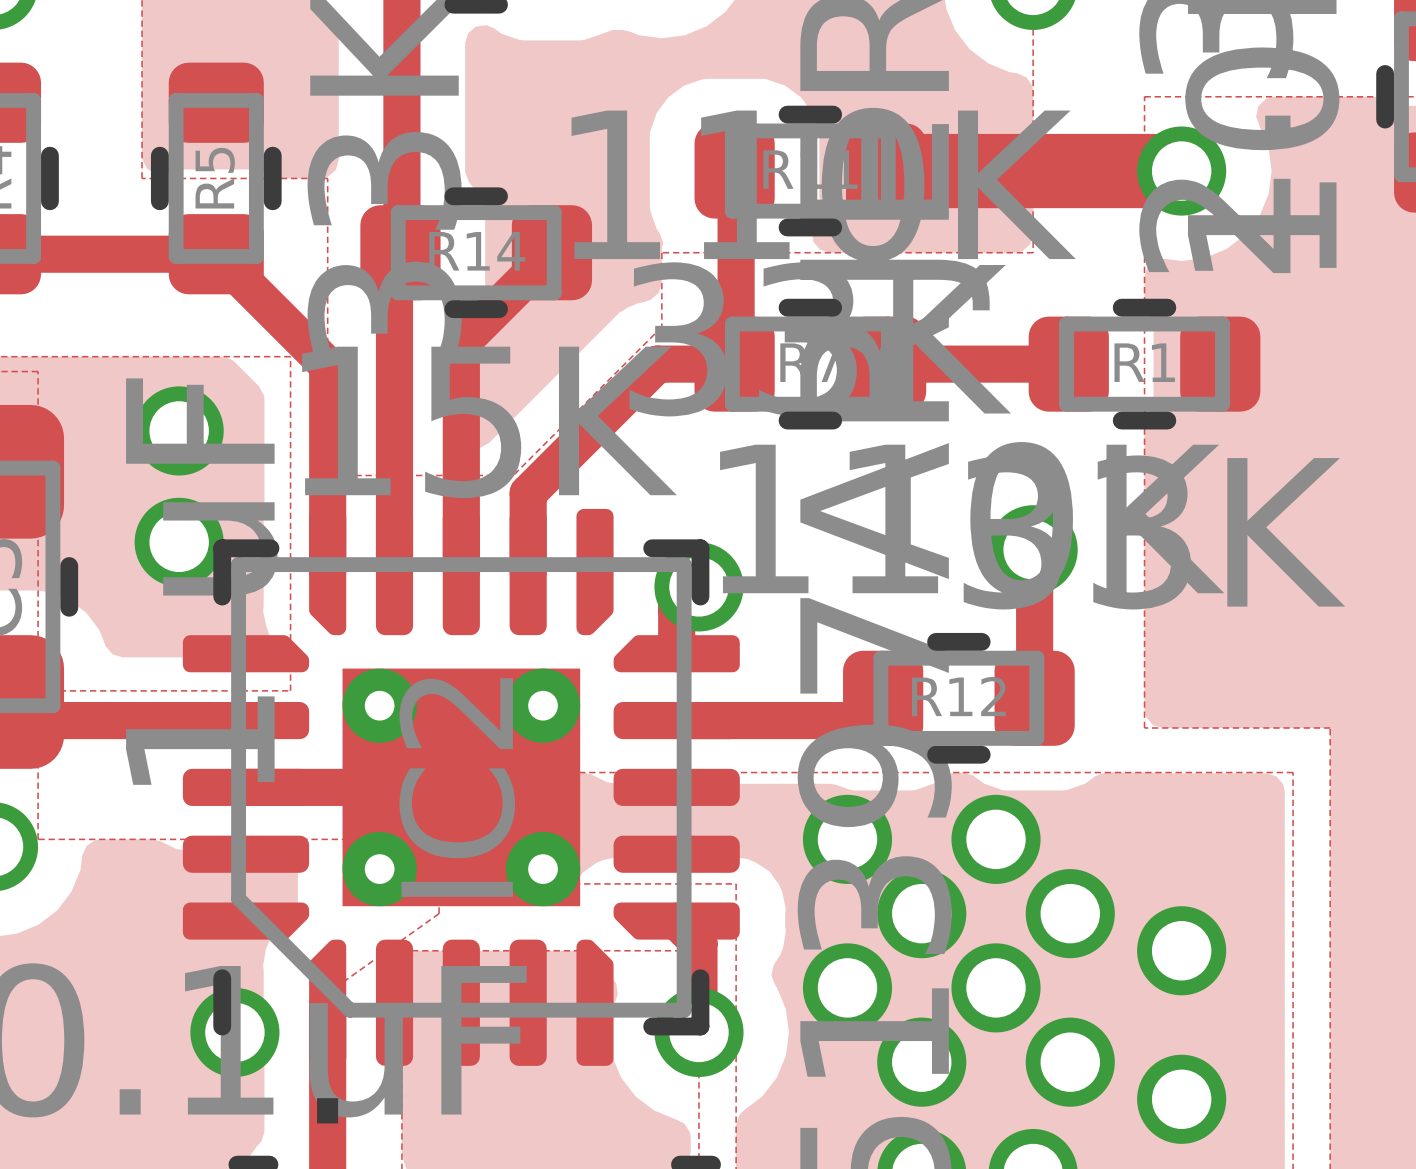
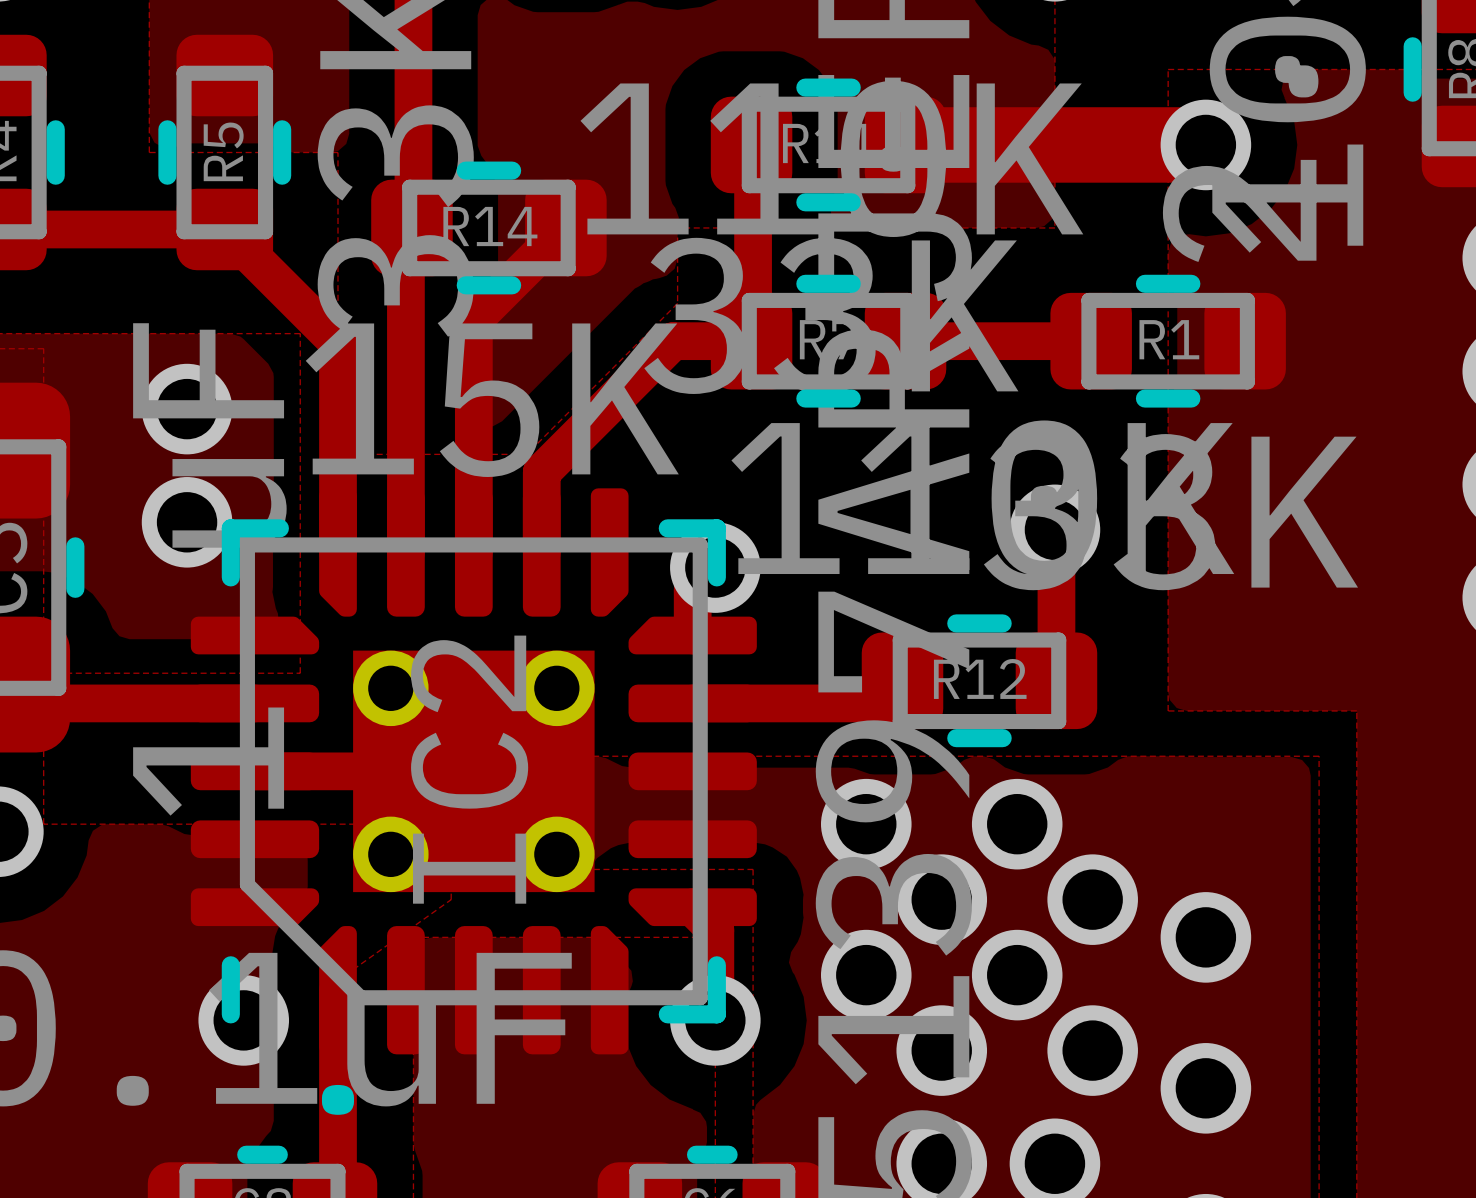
IC2 footprint: [182, 508, 740, 1066] -> [190, 488, 757, 1055]

